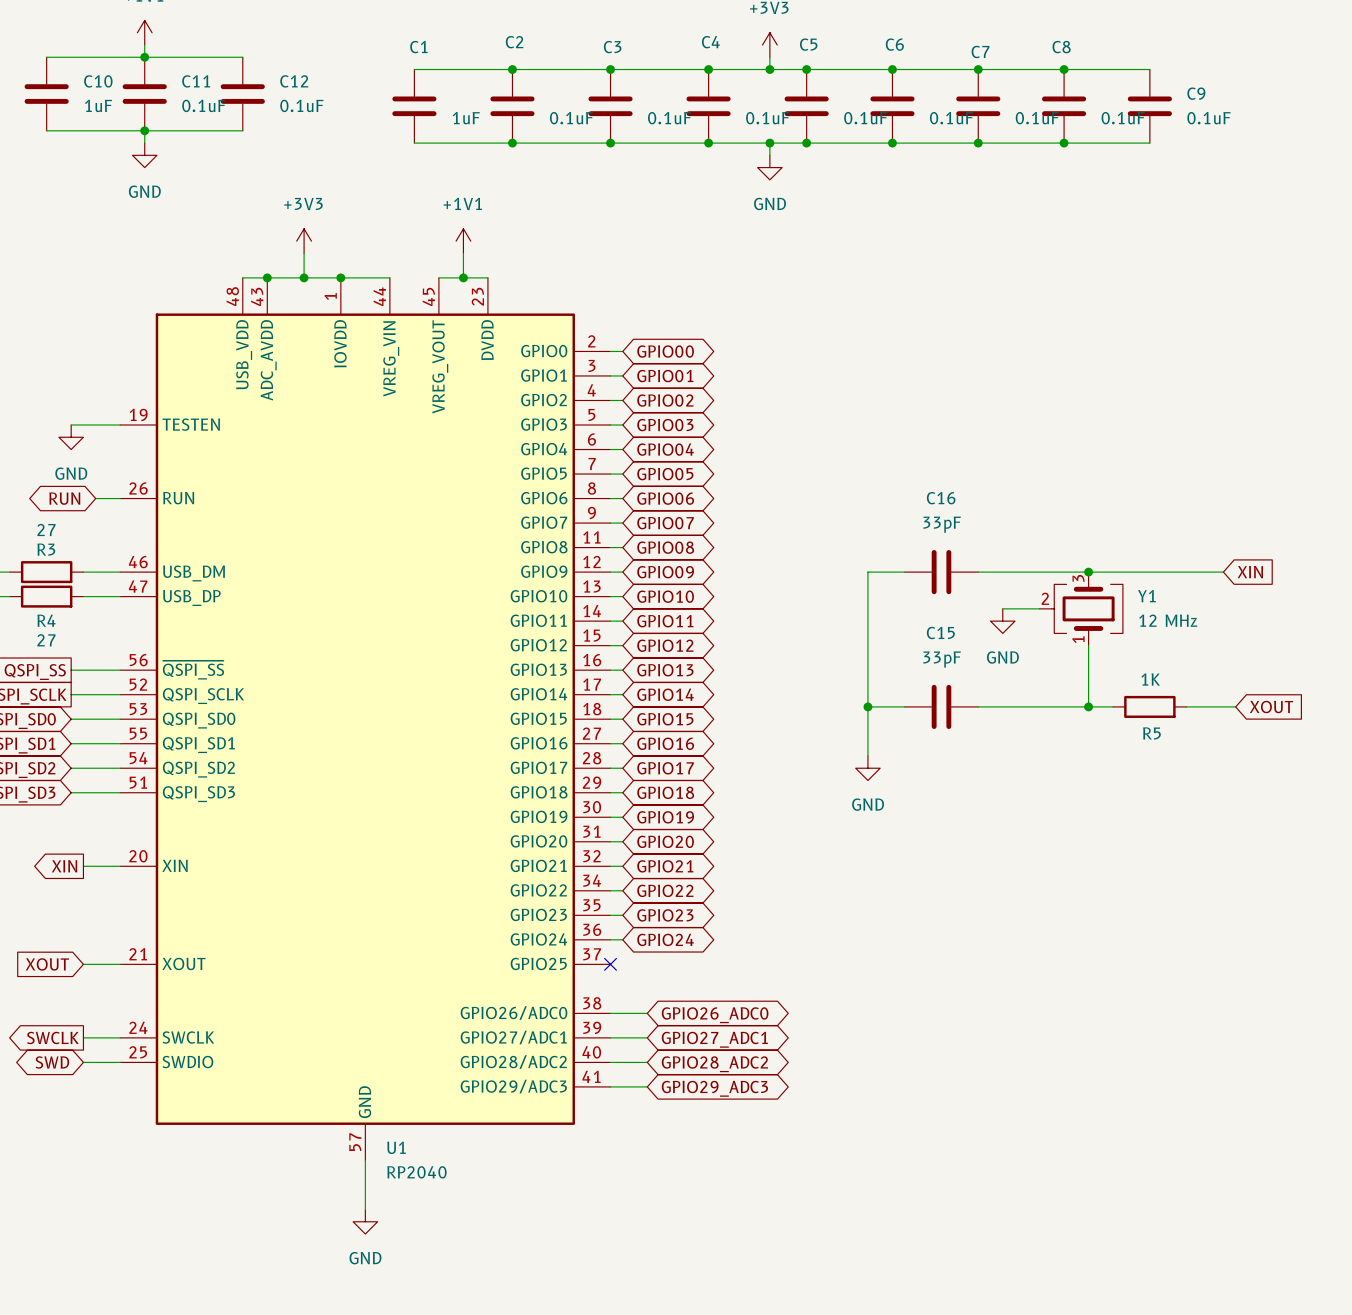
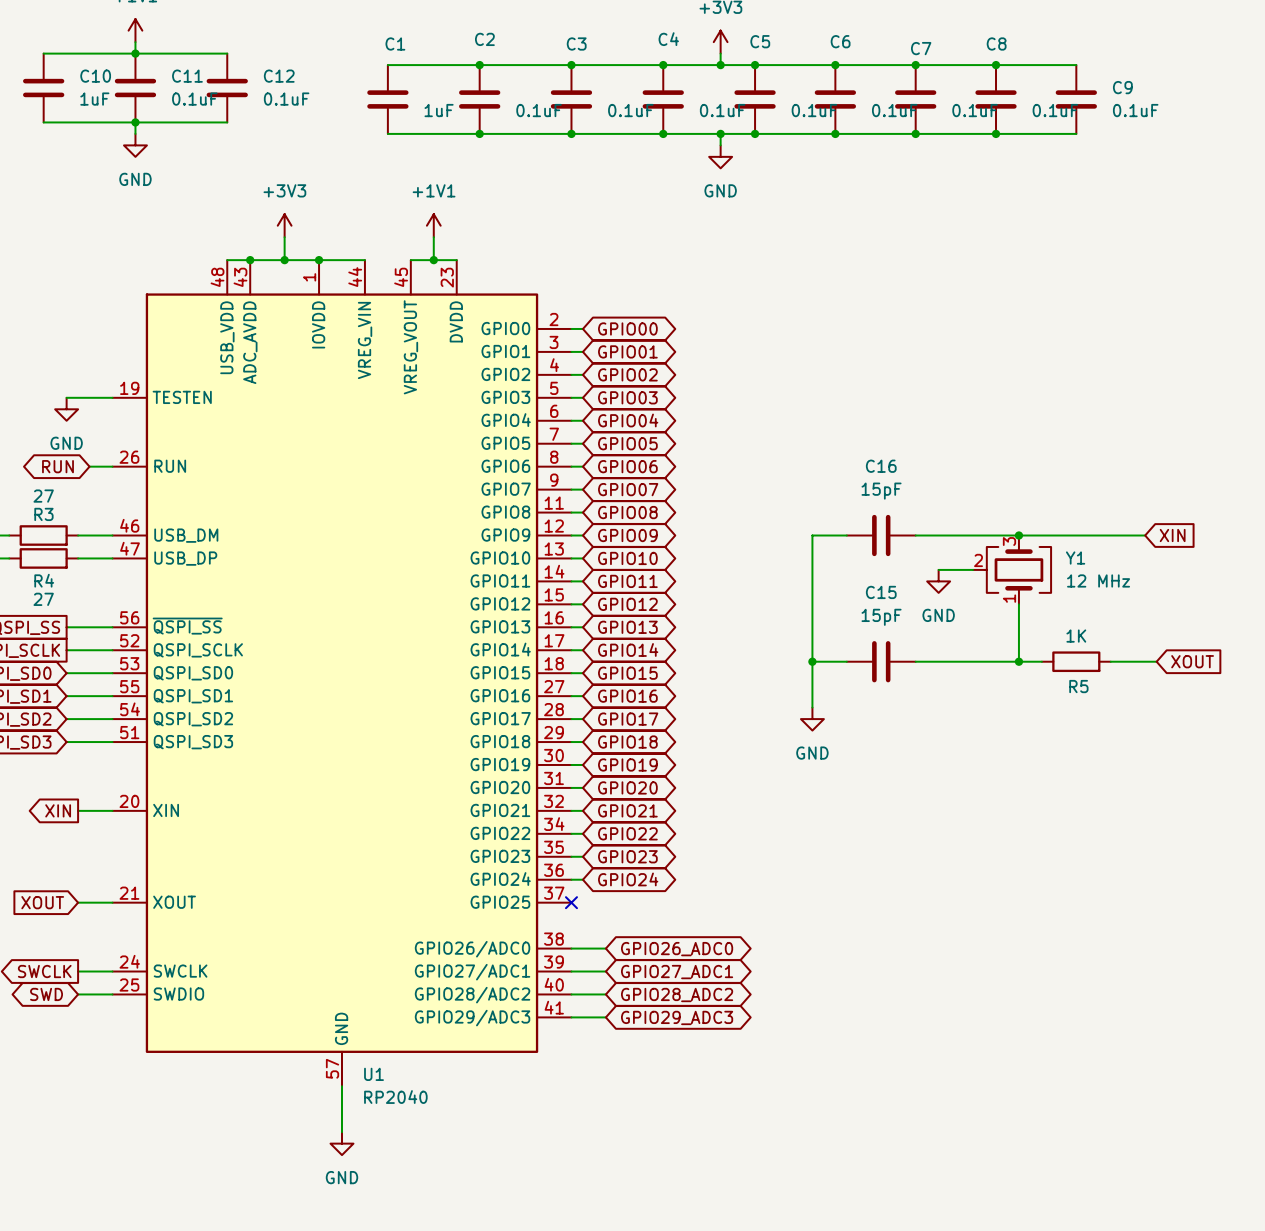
C16 value: 33pF (942, 524) -> 15pF (881, 491)
C15 value: 33pF (942, 659) -> 15pF (881, 617)

